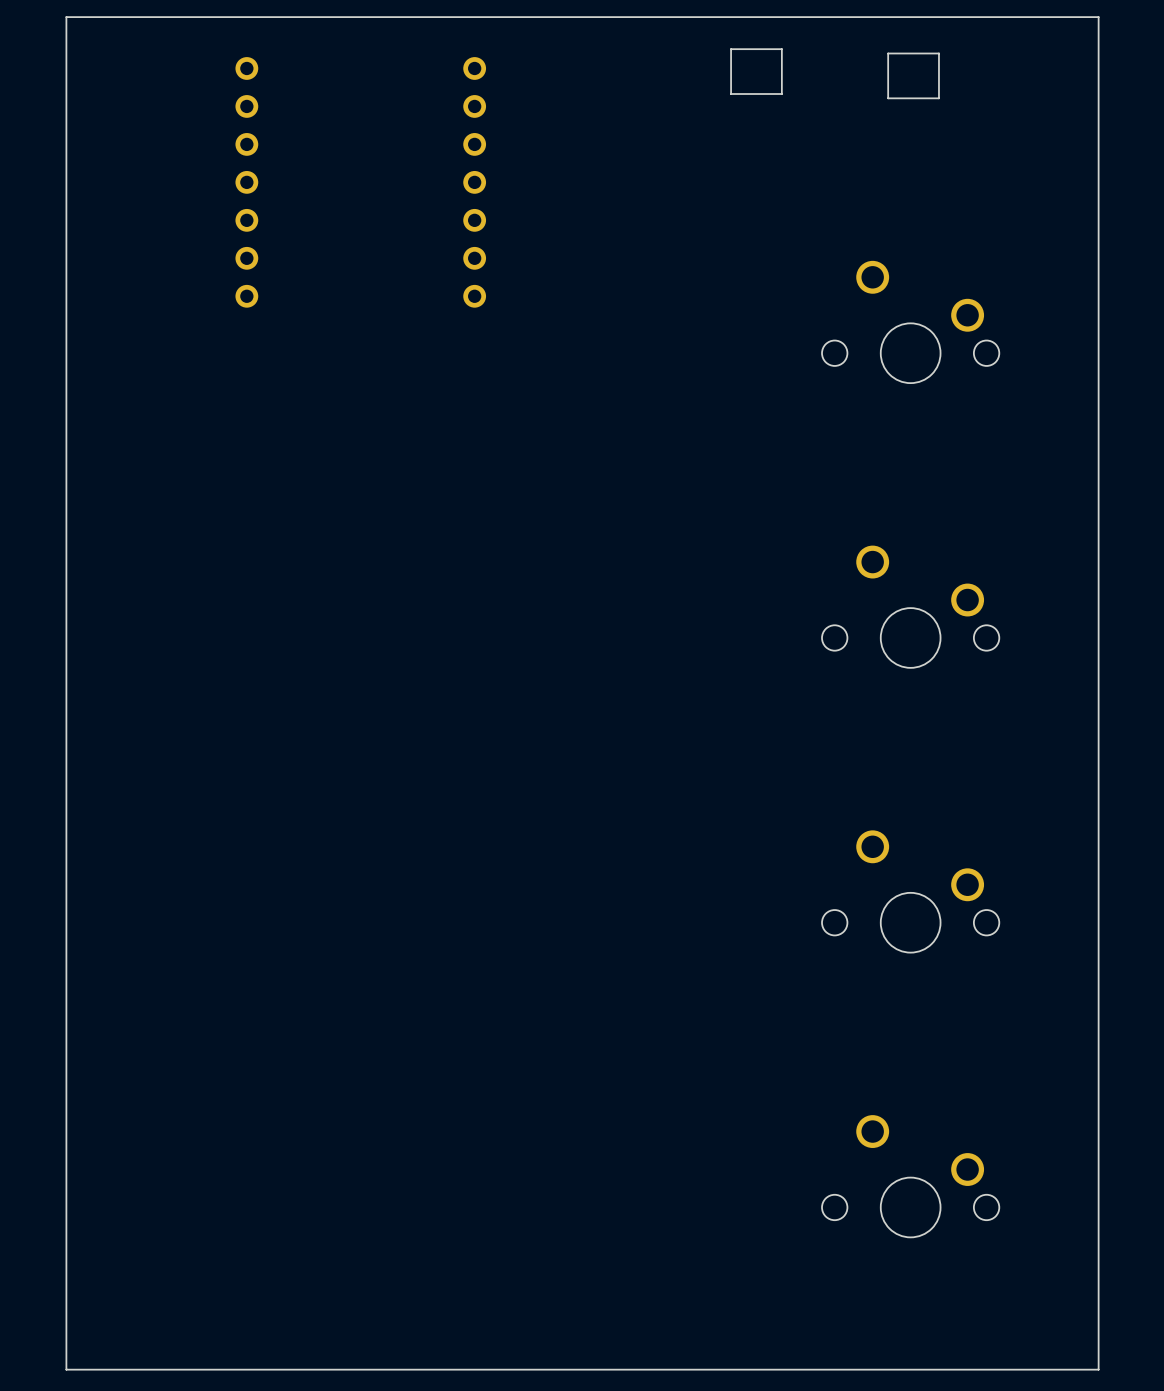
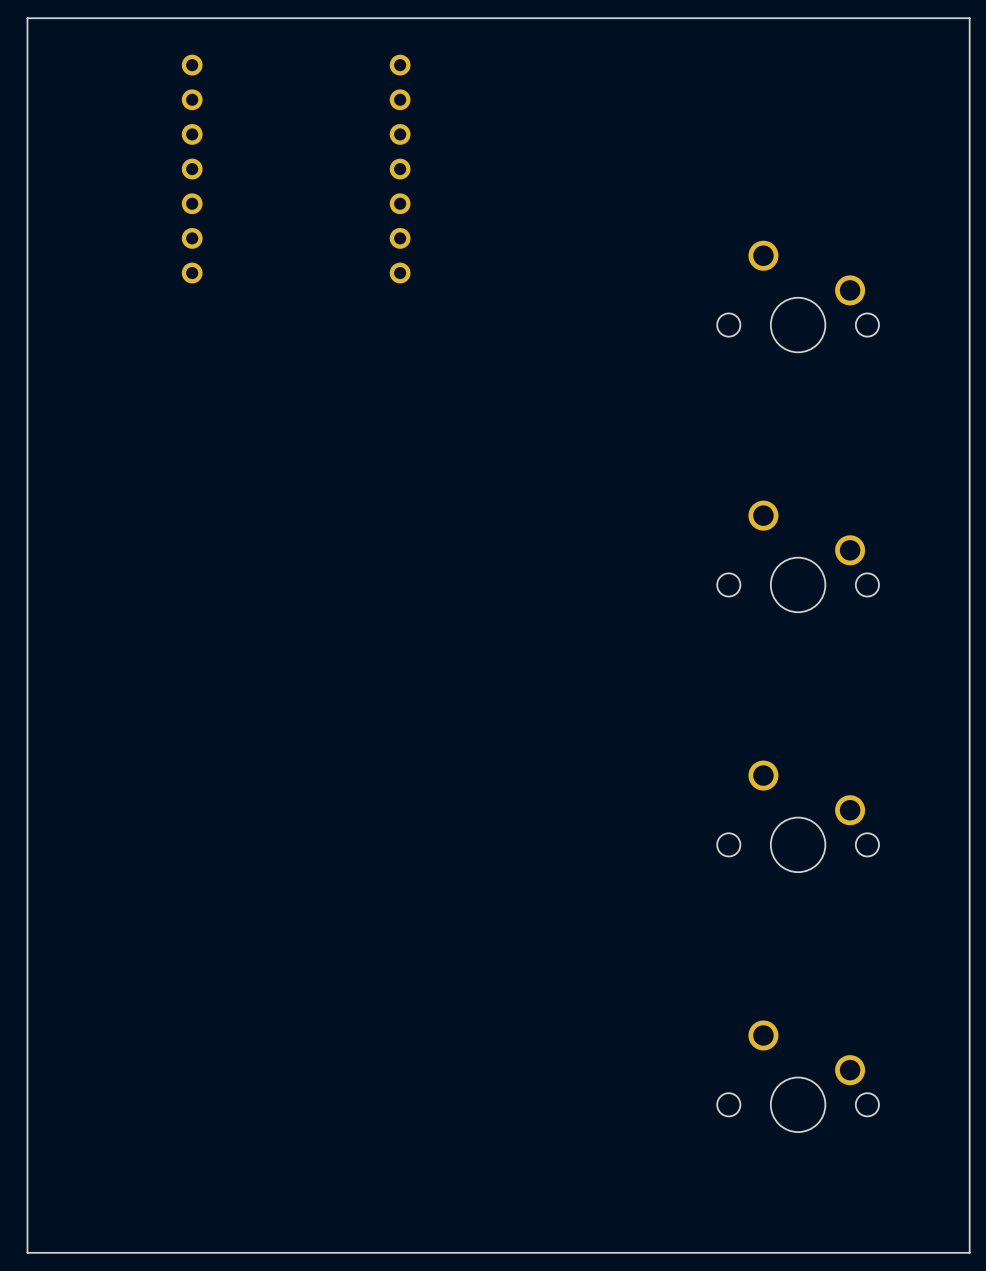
part: (756, 71) -> none
part: (913, 75) -> none

